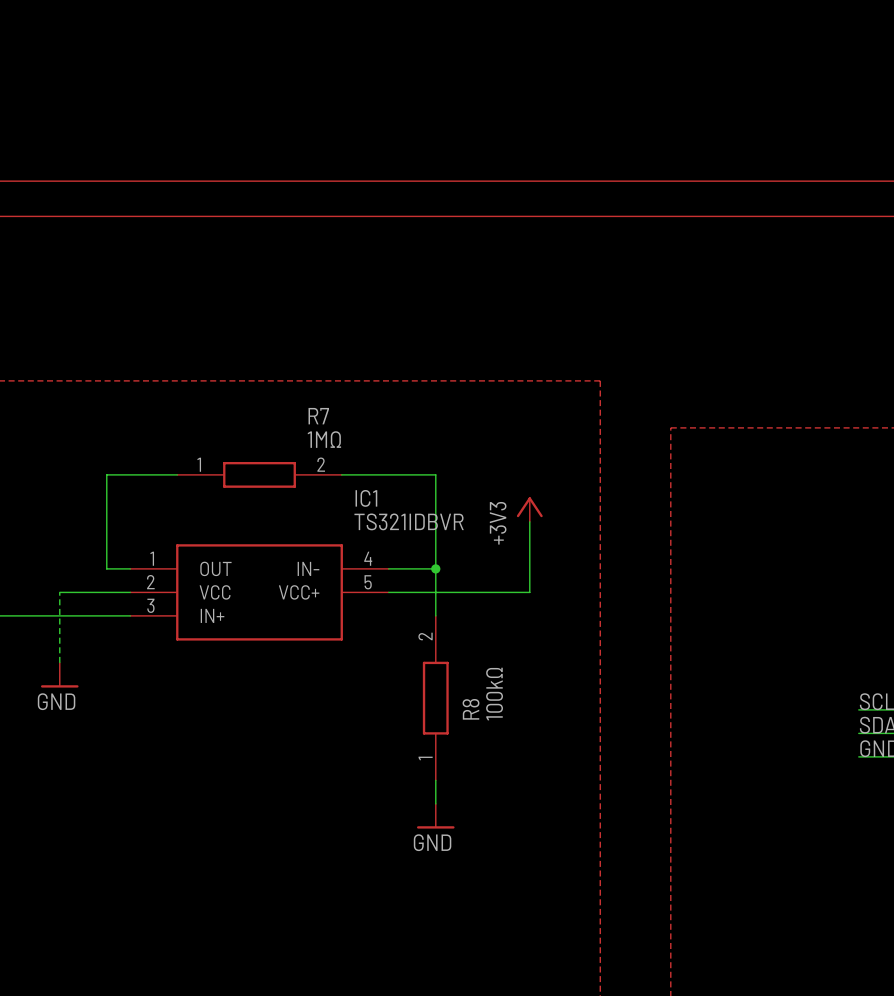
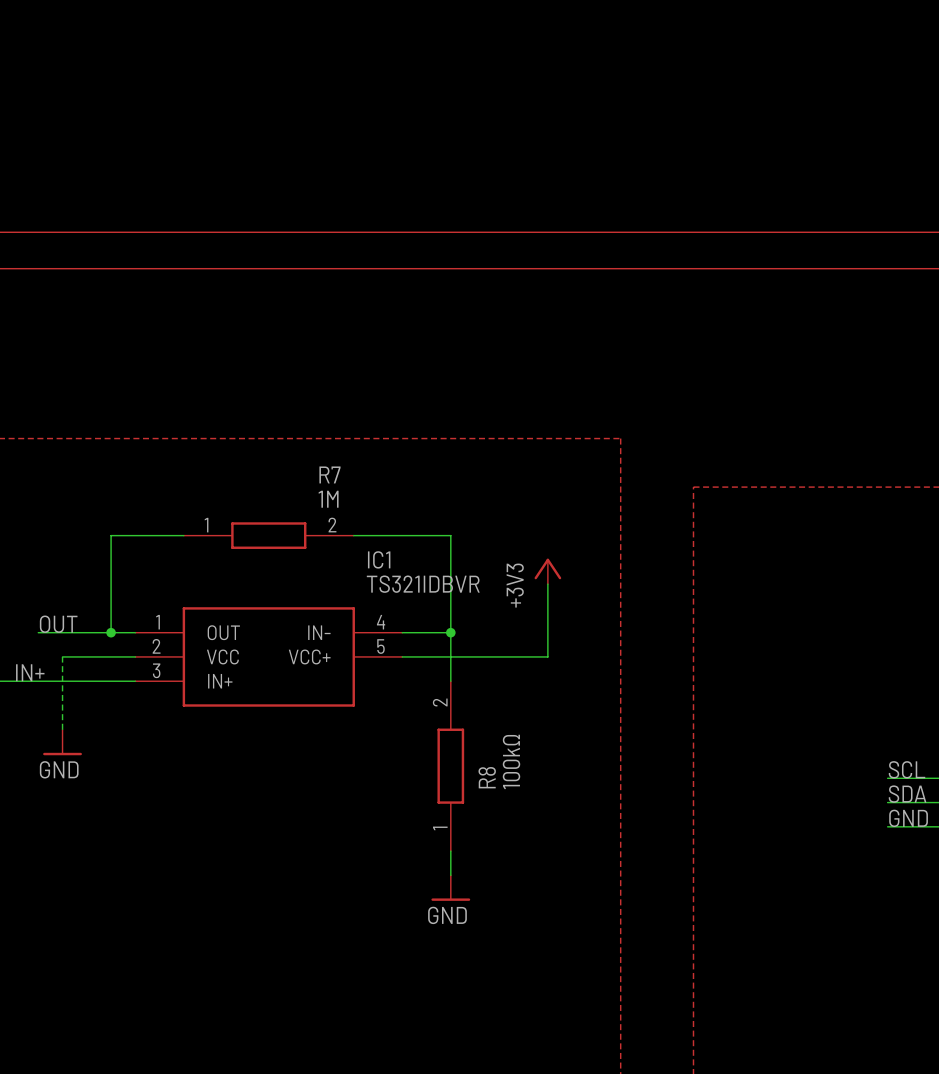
R7 value: 1MΩ (324, 439) -> 1M (328, 499)
label: none -> OUT (58, 624)
wire: none -> (38, 632) (111, 632)
junction: none -> (111, 632)
label: none -> IN+ (30, 672)

